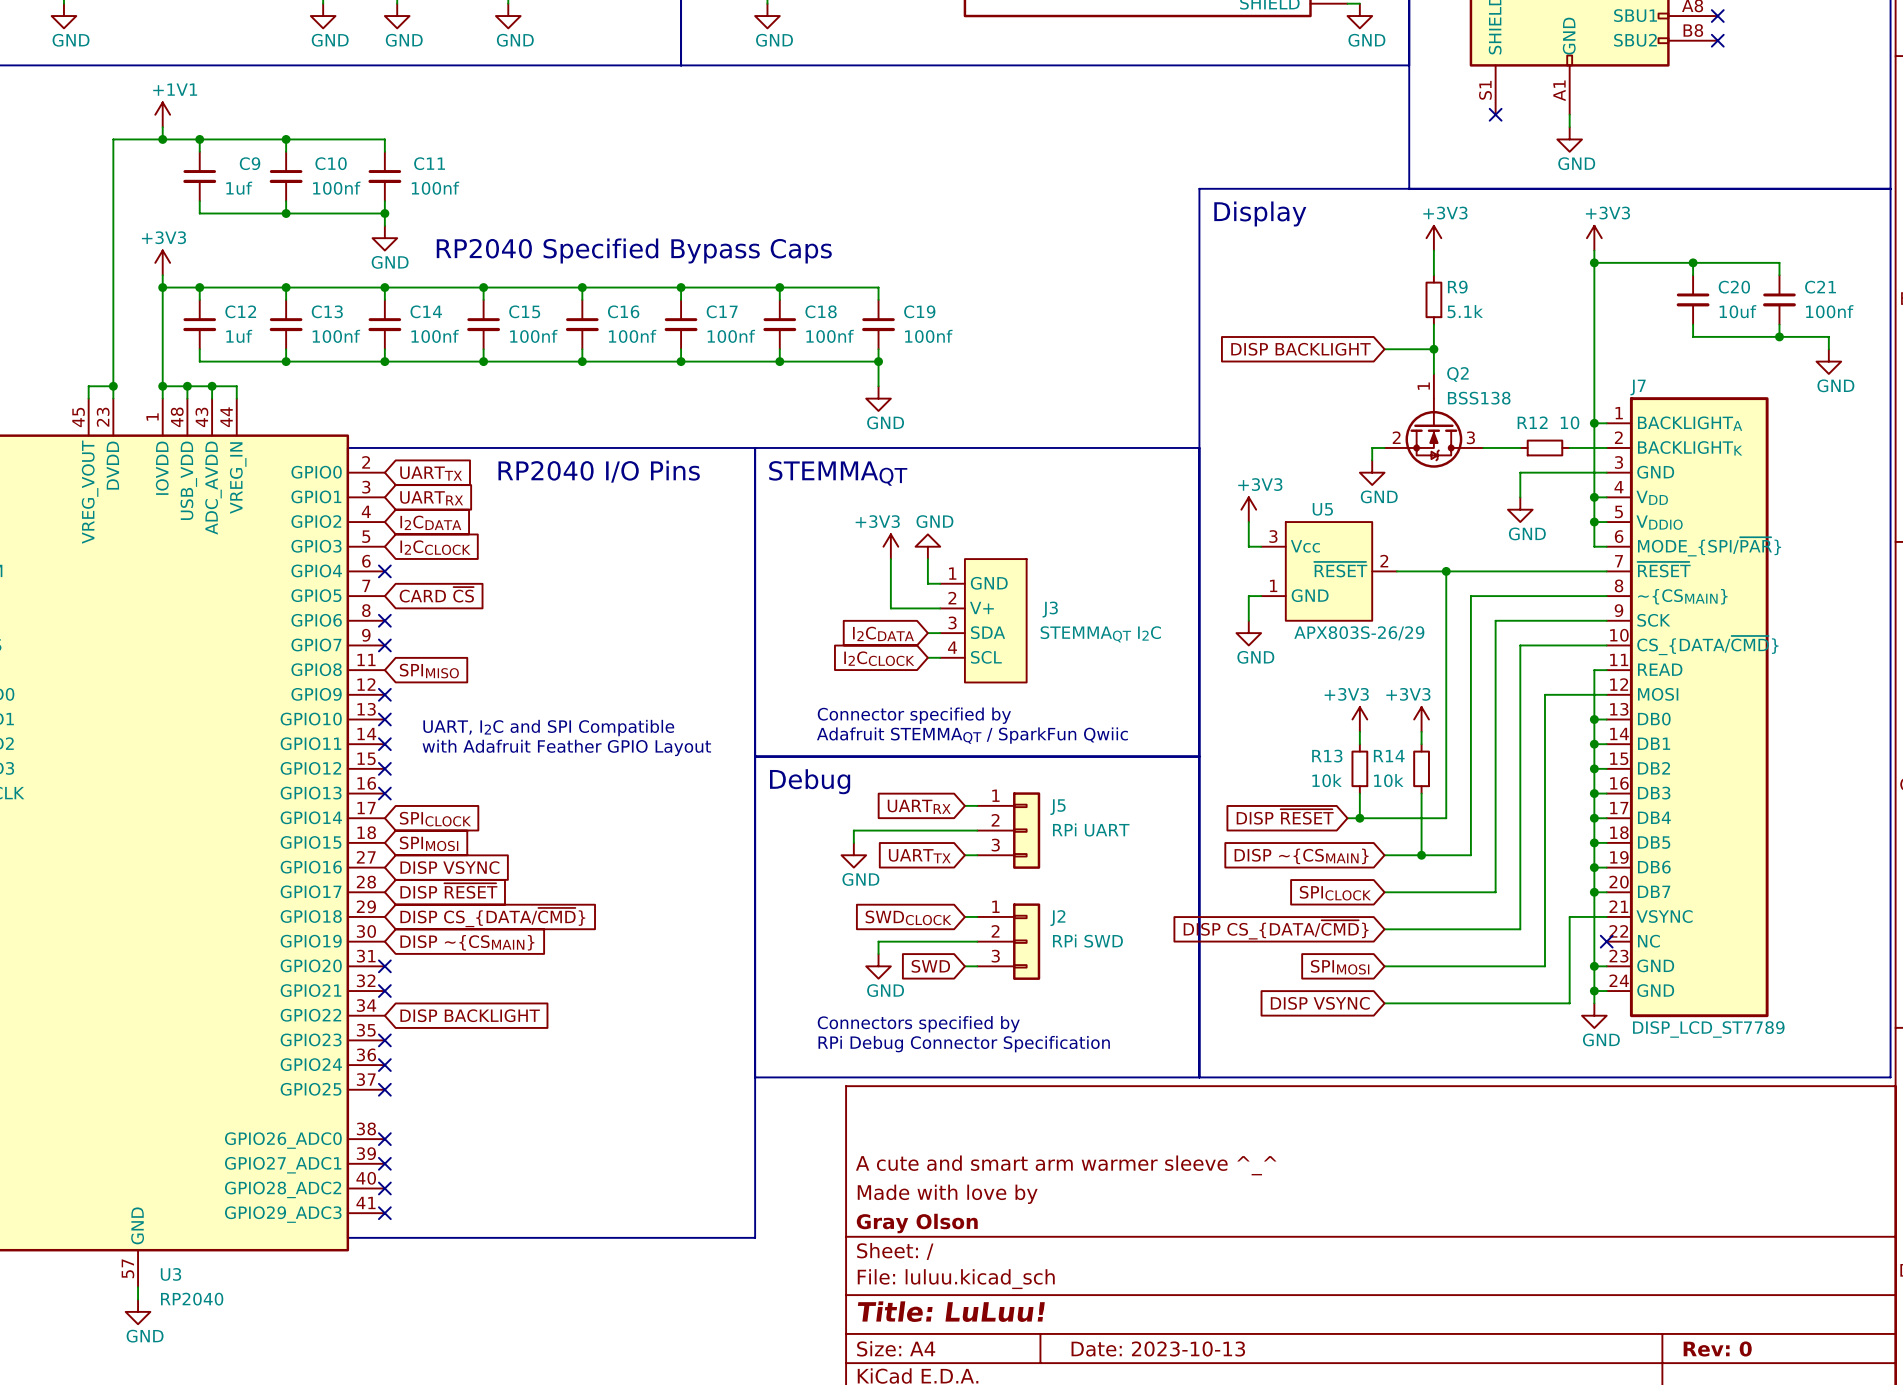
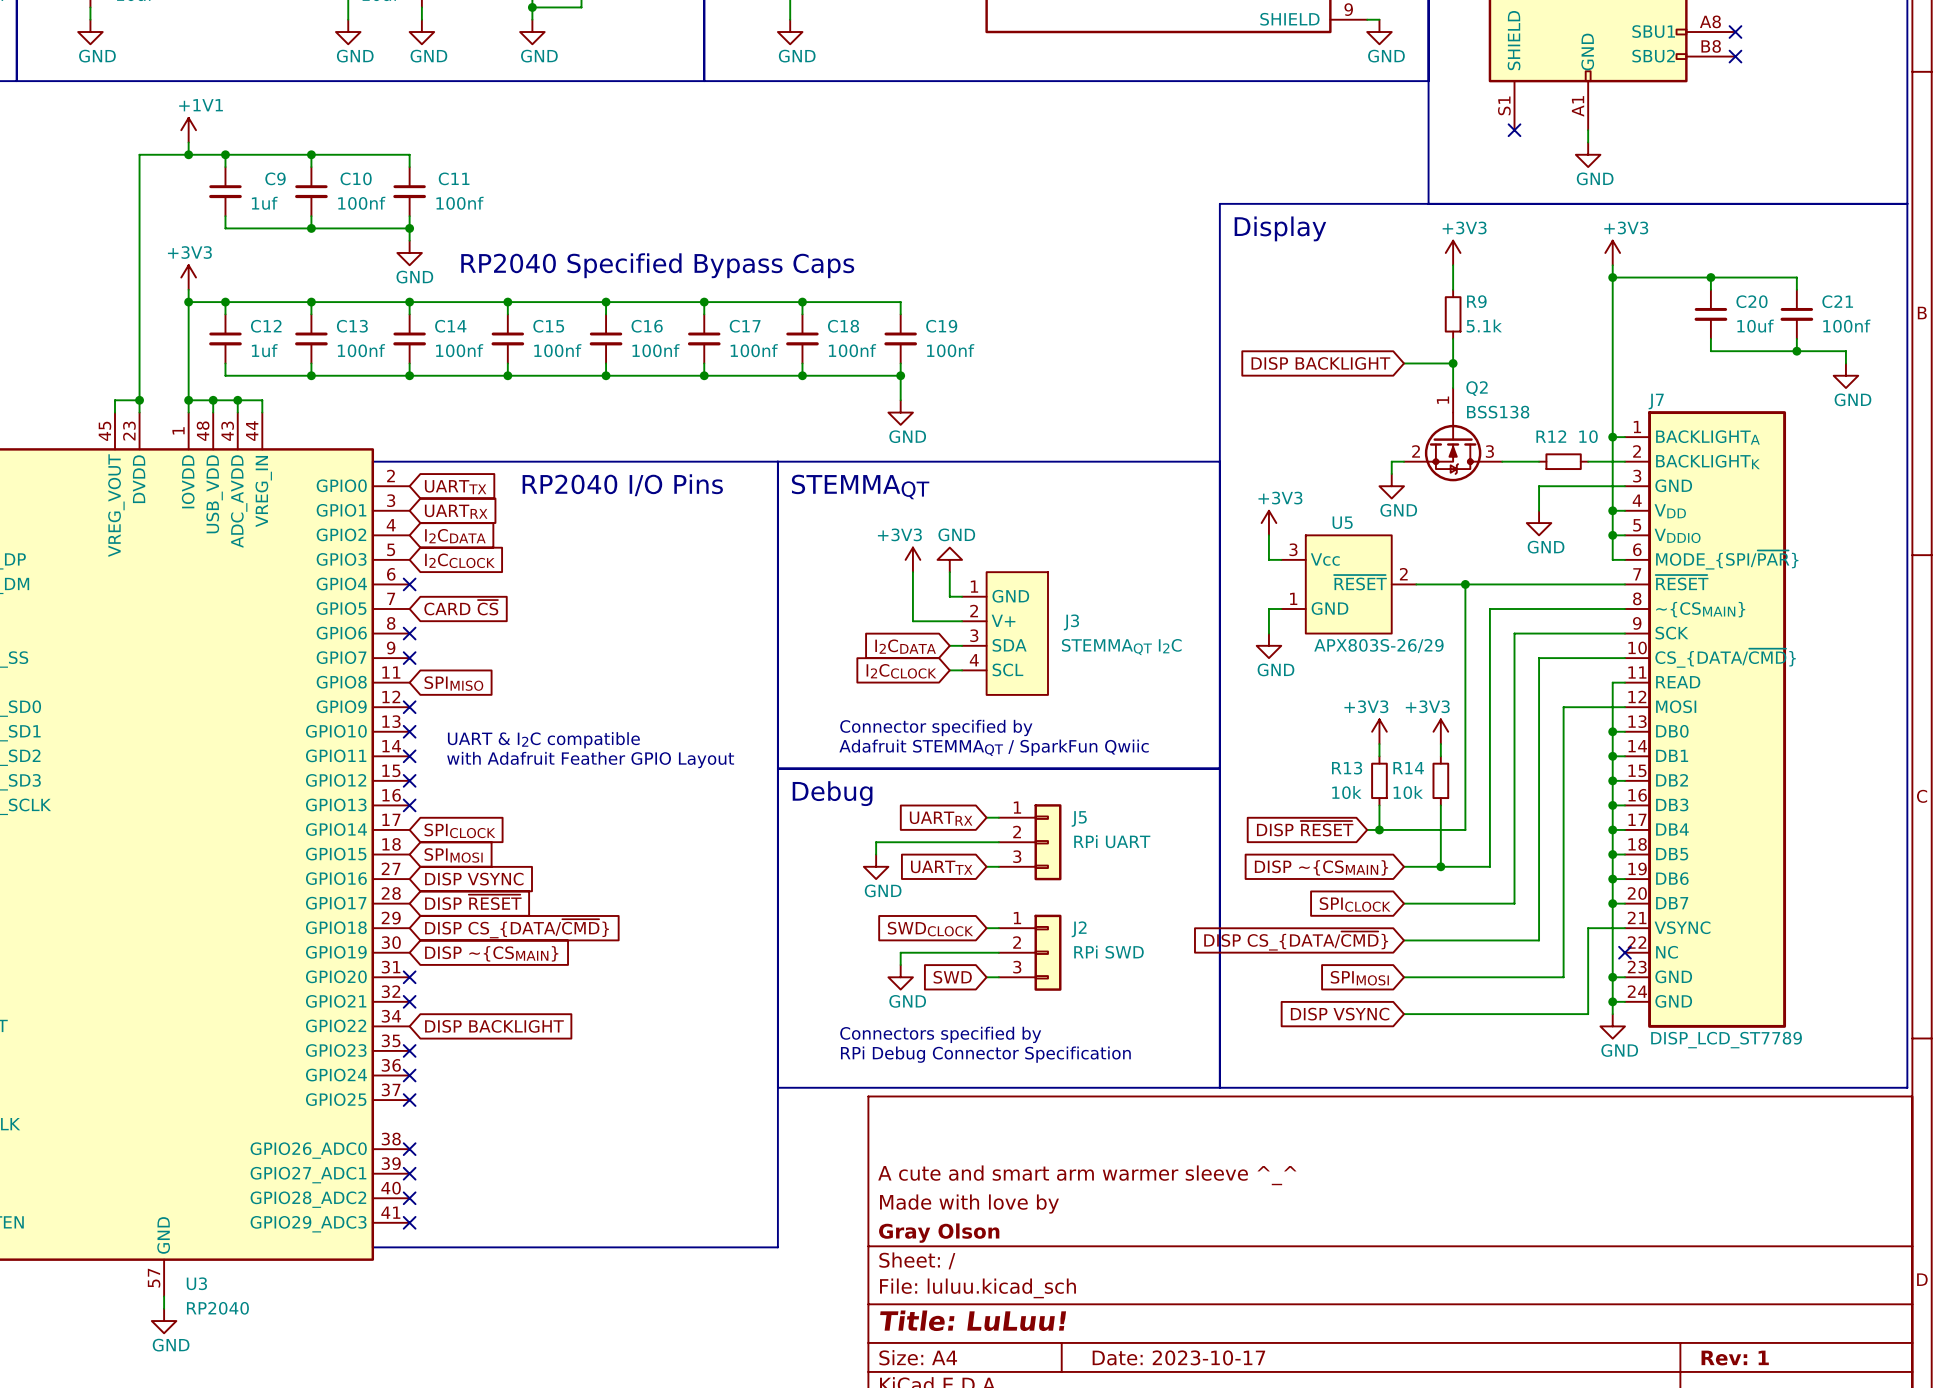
text: UART, I2C and SPI Compatible (548, 728) -> UART & I2C compatible (543, 740)
title block: Date: 2023-10-13 (1158, 1348) -> Date: 2023-10-17 (1178, 1357)
title block: Rev: 0 (1717, 1348) -> Rev: 1 (1735, 1358)

